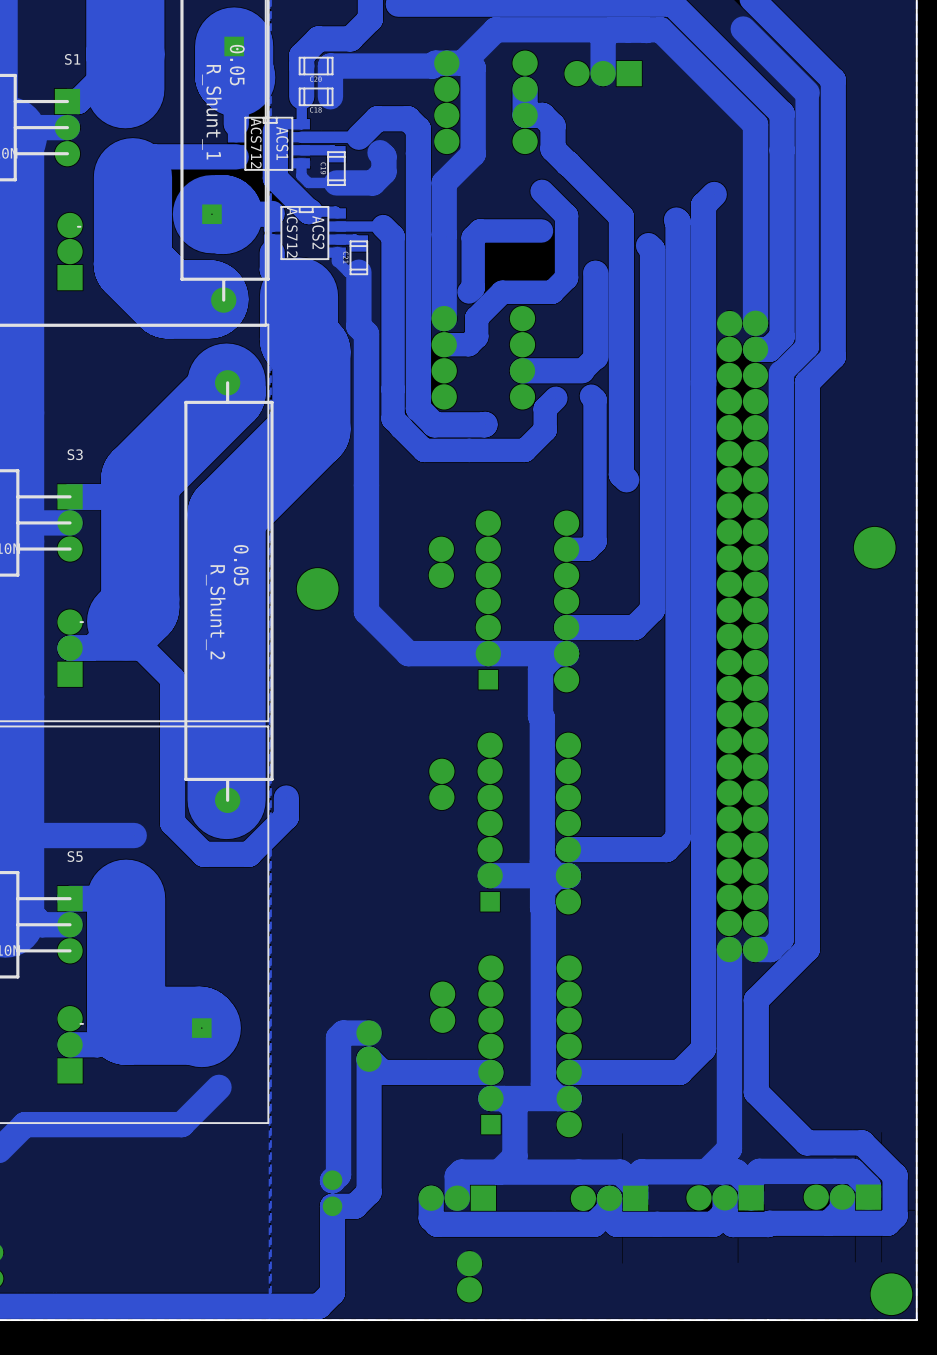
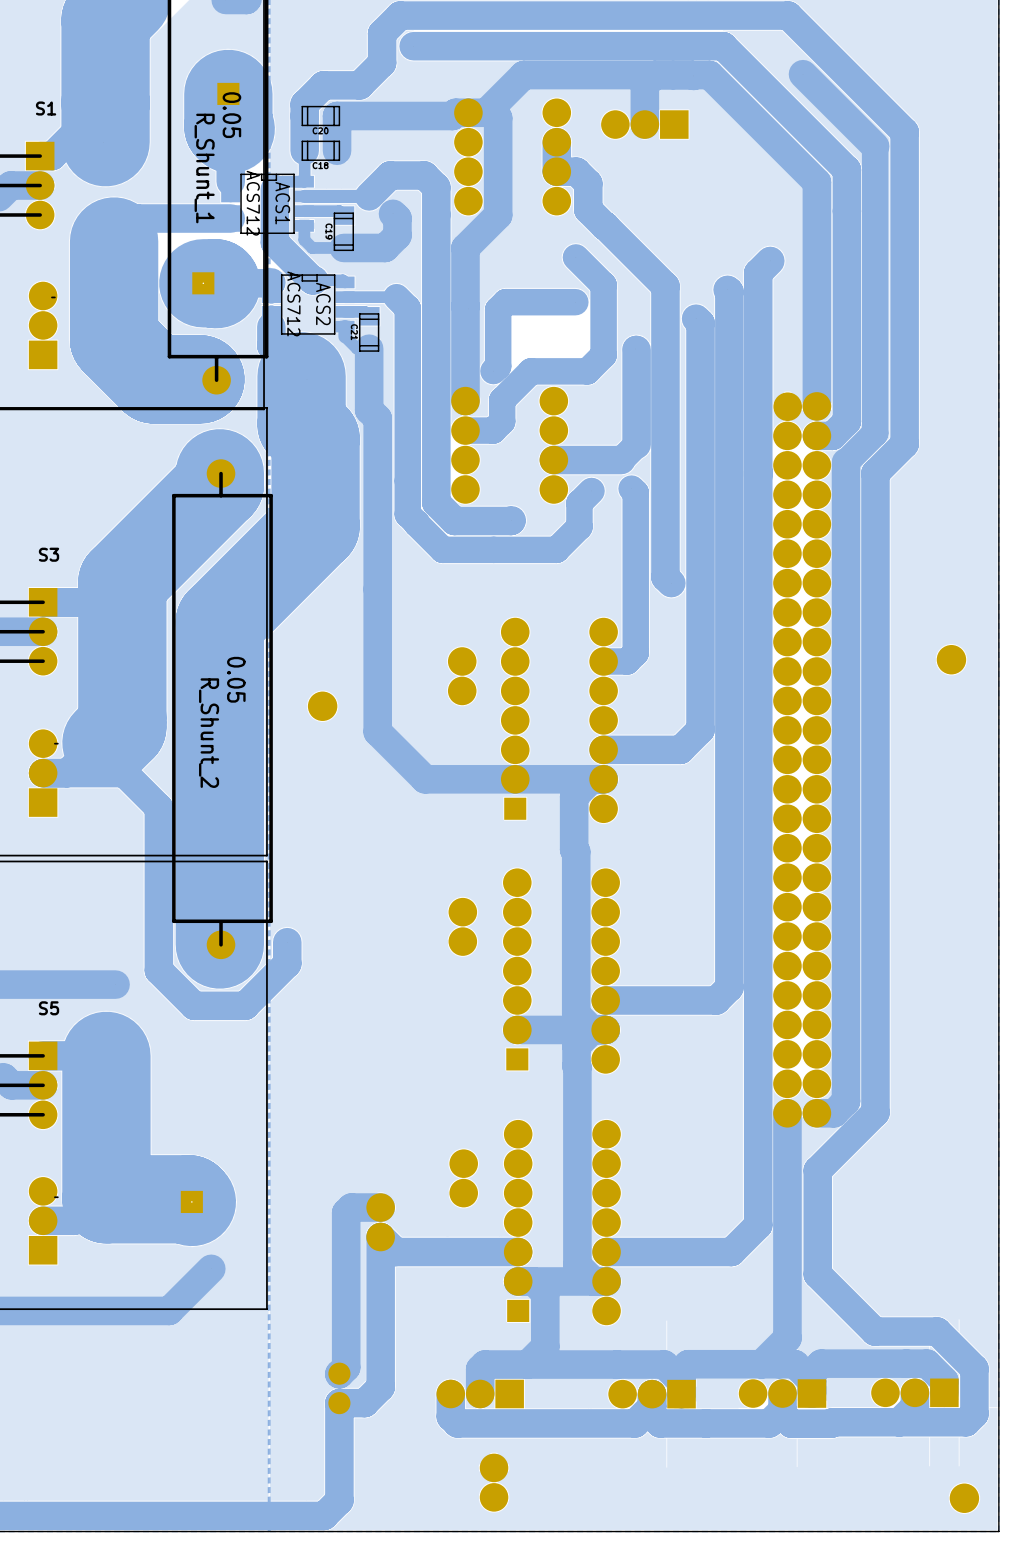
part footprint: [853, 526, 896, 569] -> [936, 645, 967, 675]
part footprint: [296, 568, 339, 610] -> [307, 691, 338, 721]
part footprint: [870, 1273, 913, 1316] -> [949, 1483, 980, 1513]

